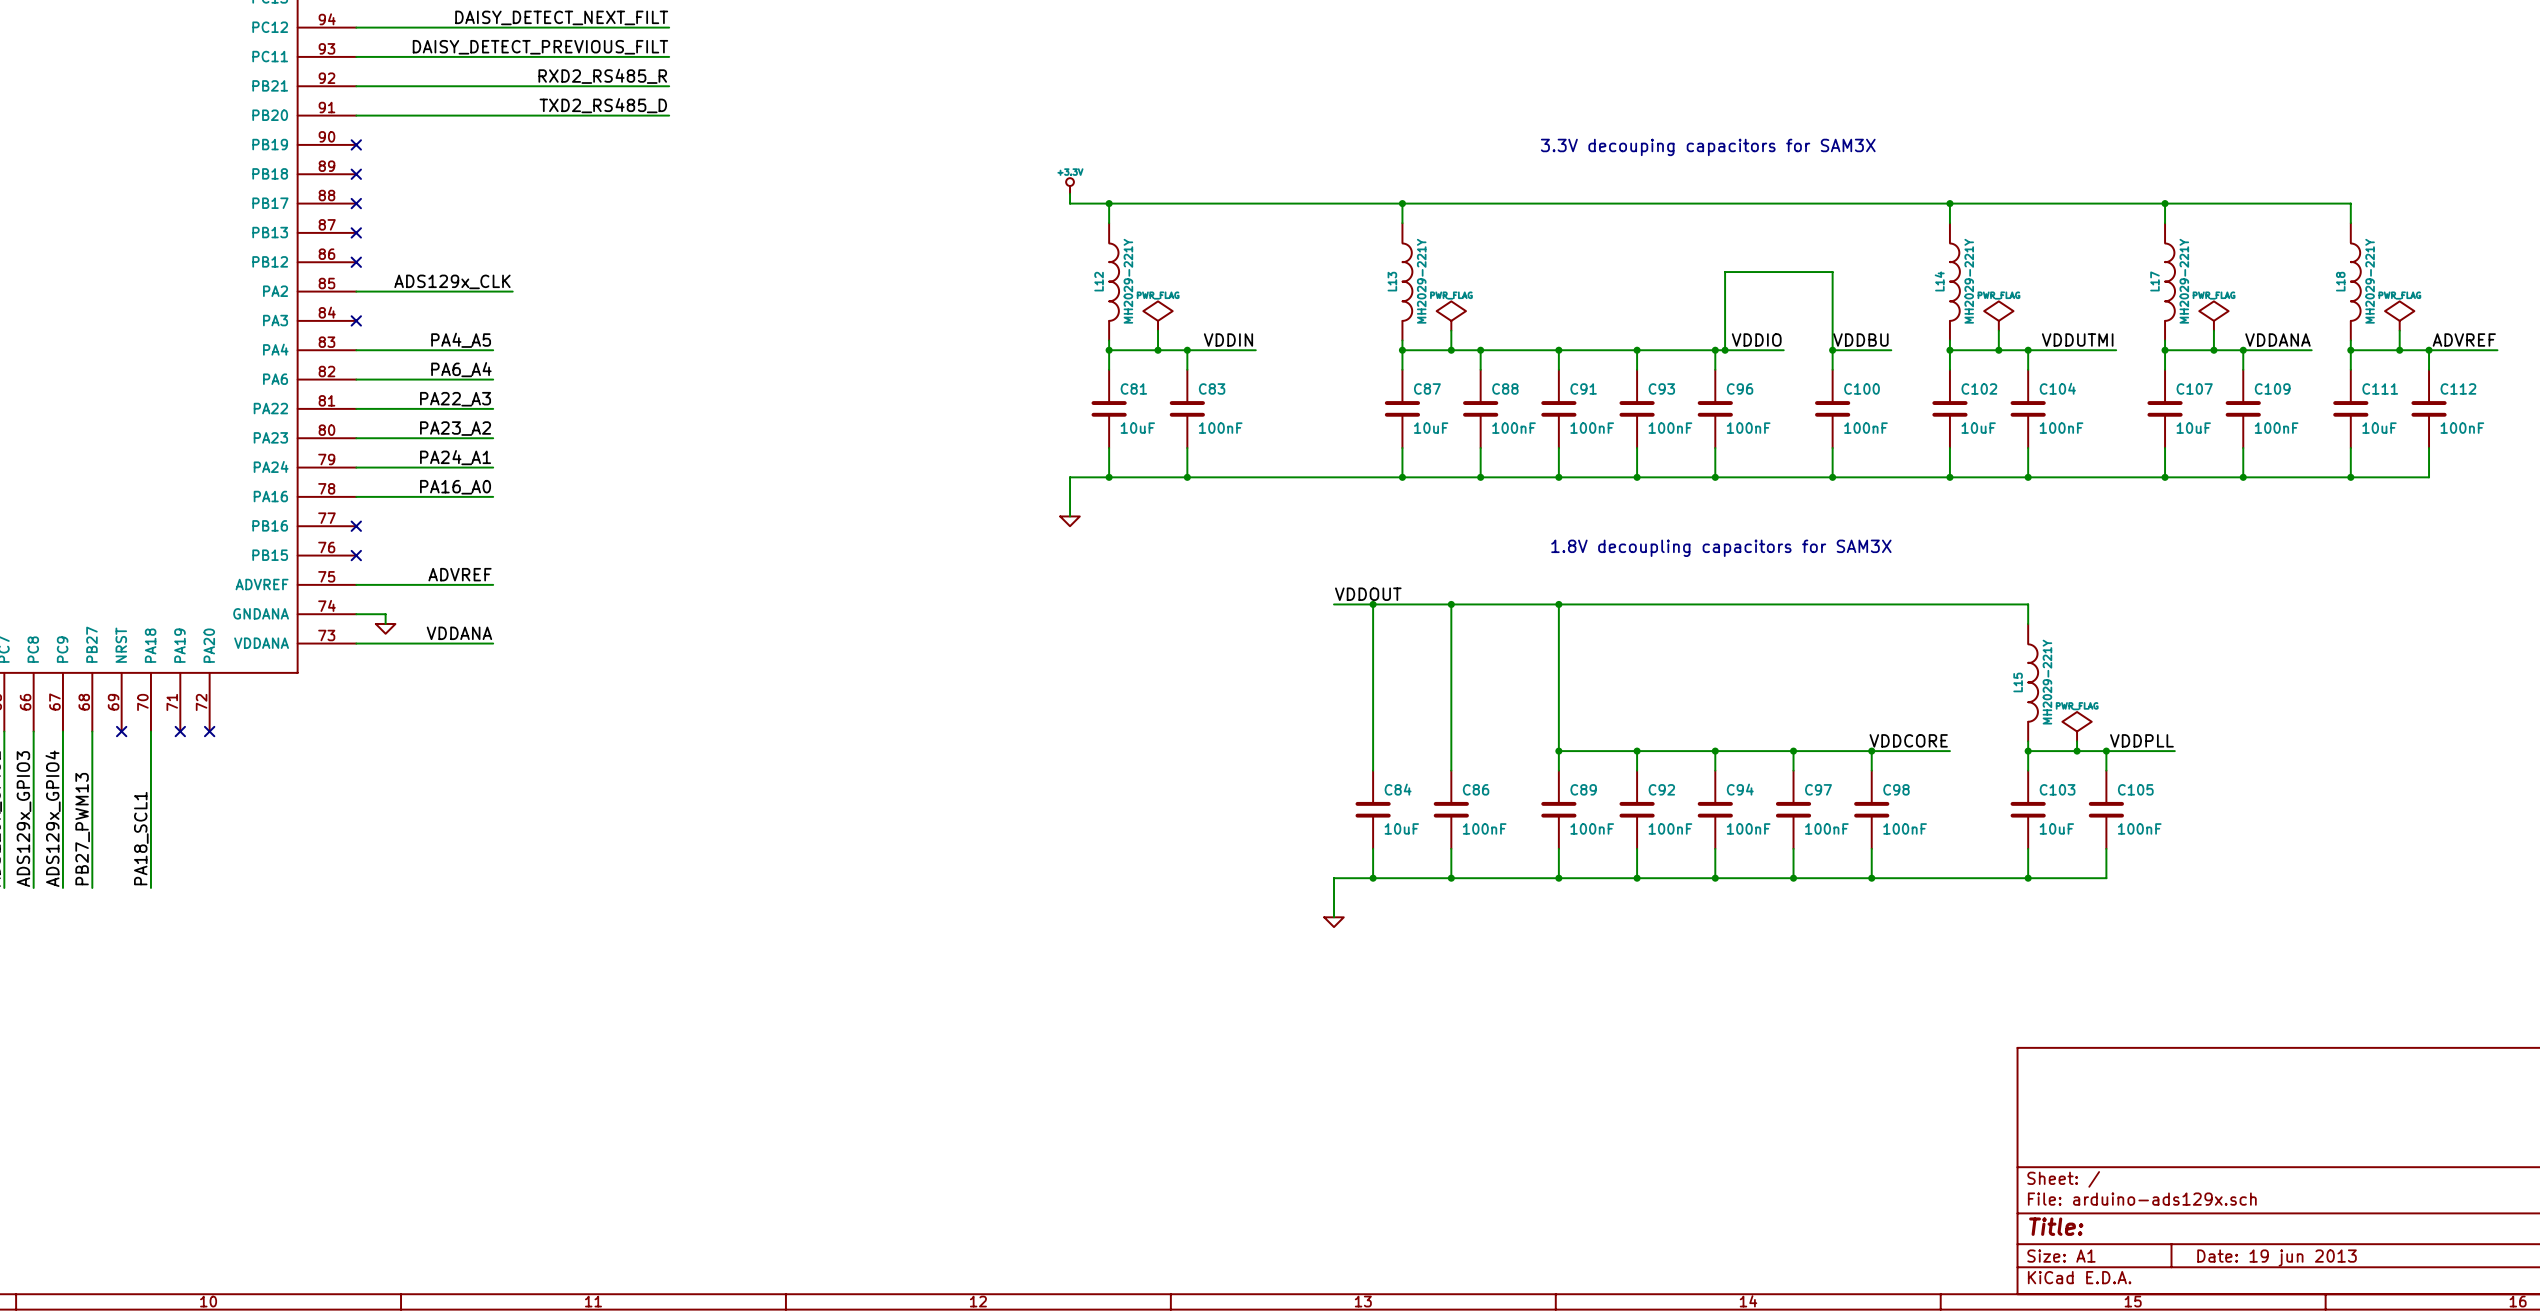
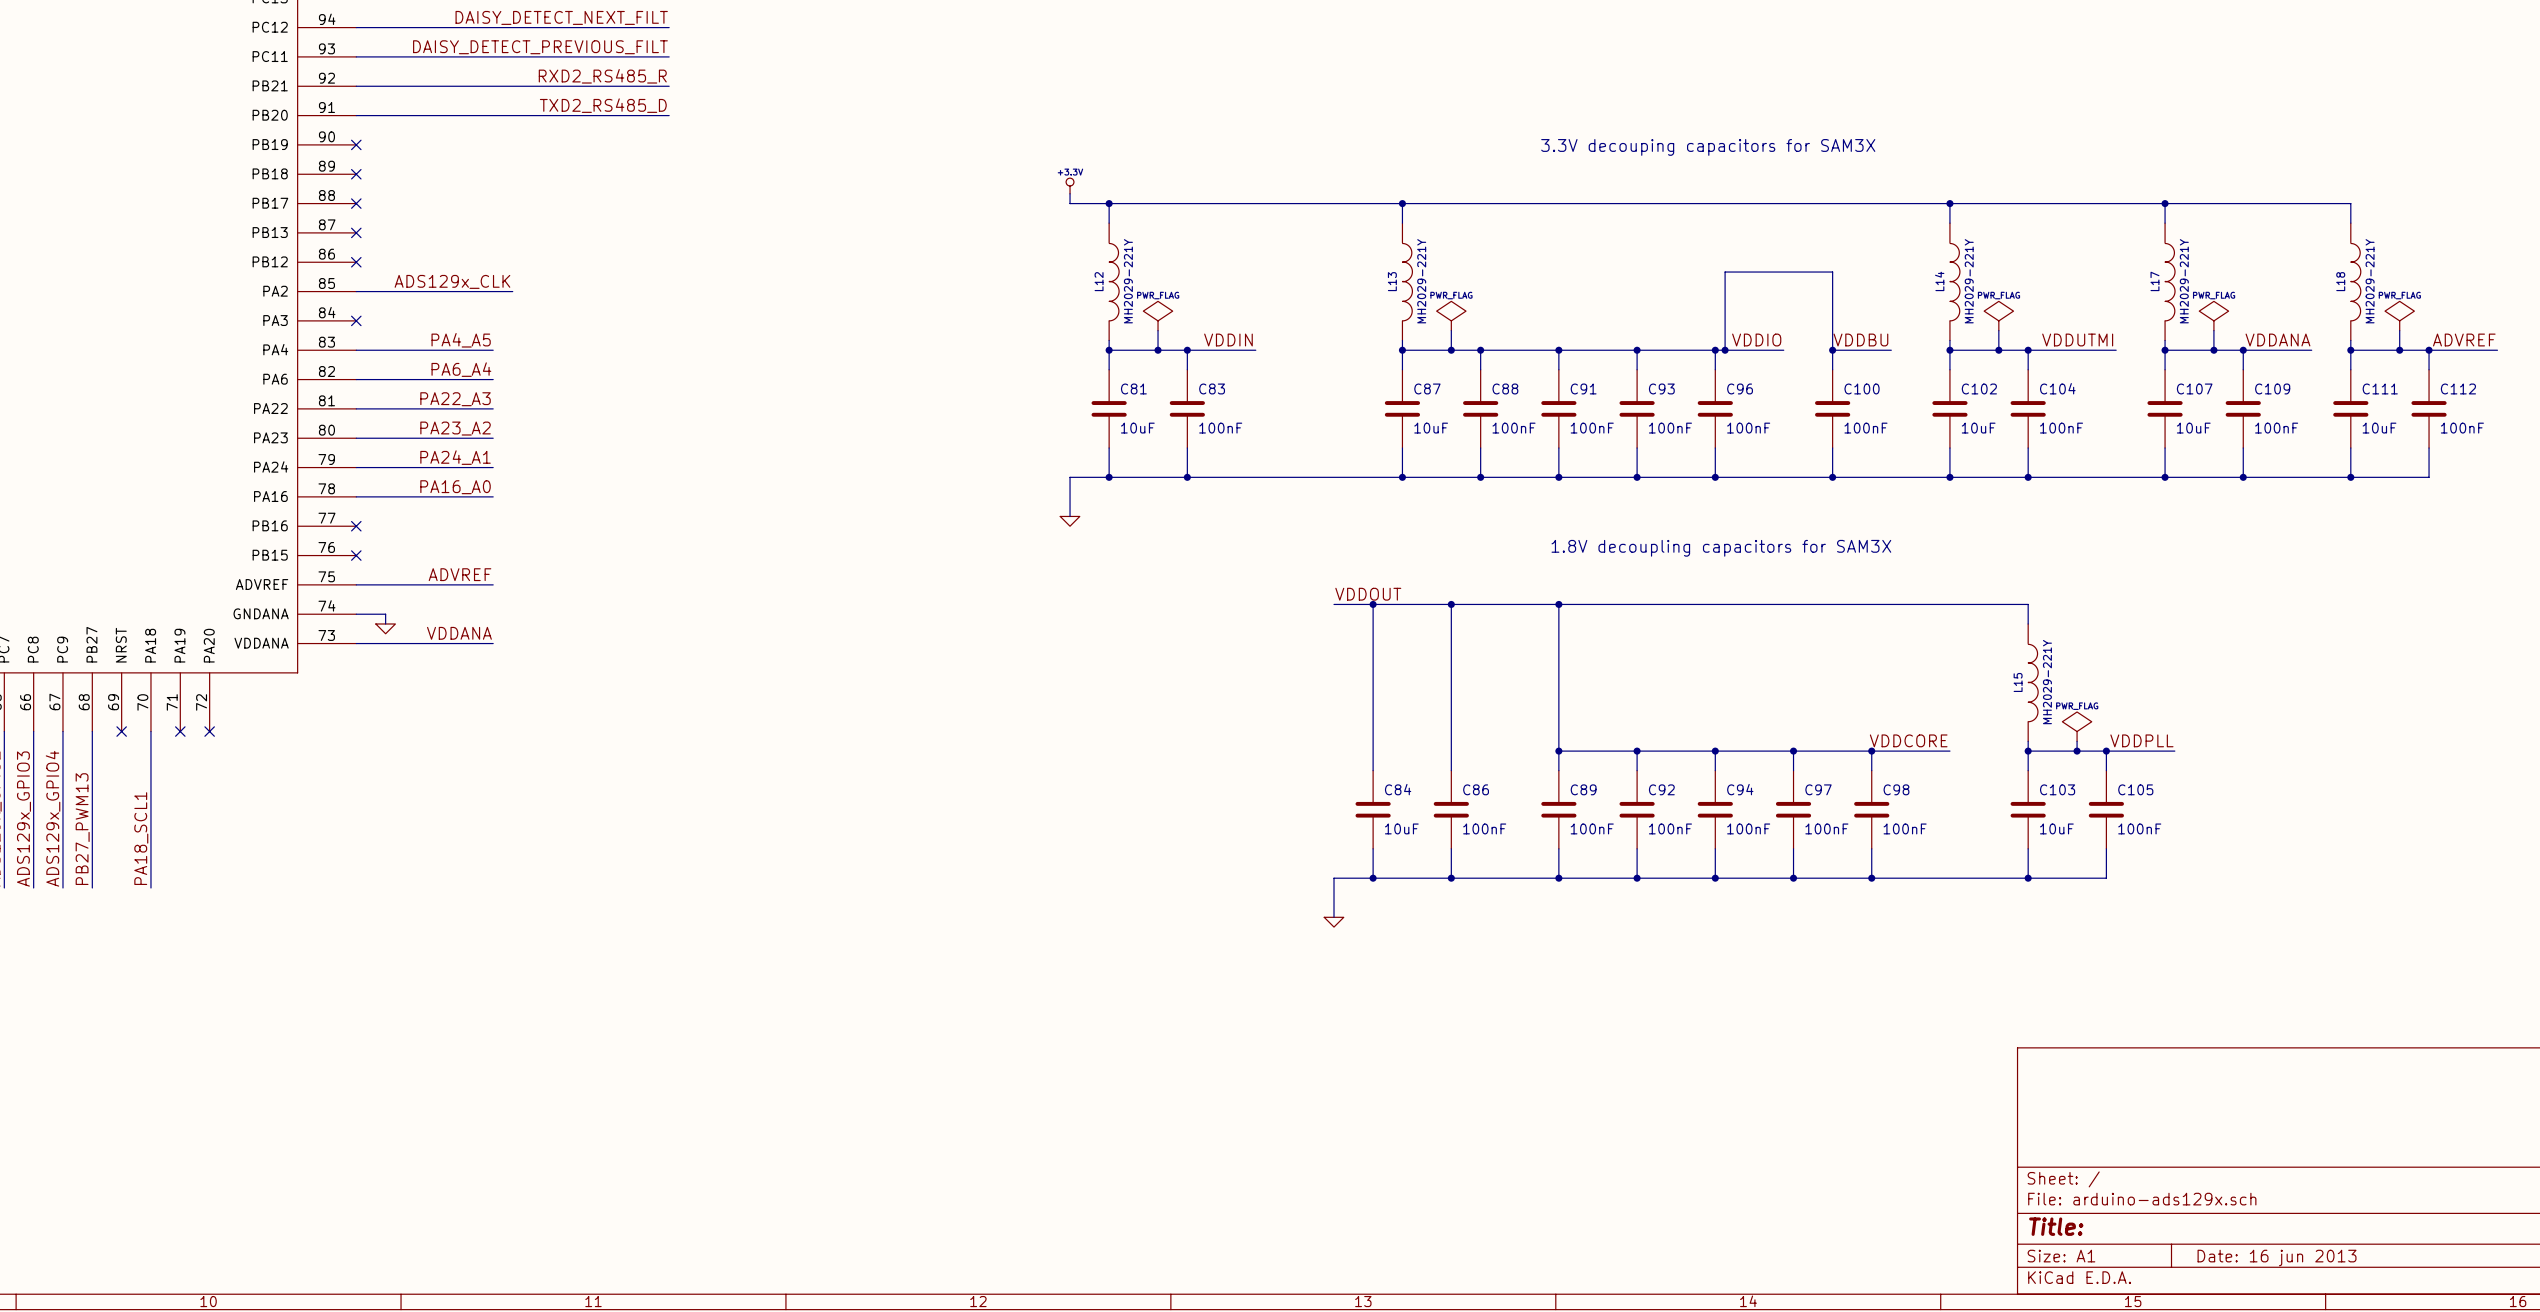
title block: Date: 19 jun 2013 (2277, 1257) -> Date: 16 jun 2013 (2277, 1257)

